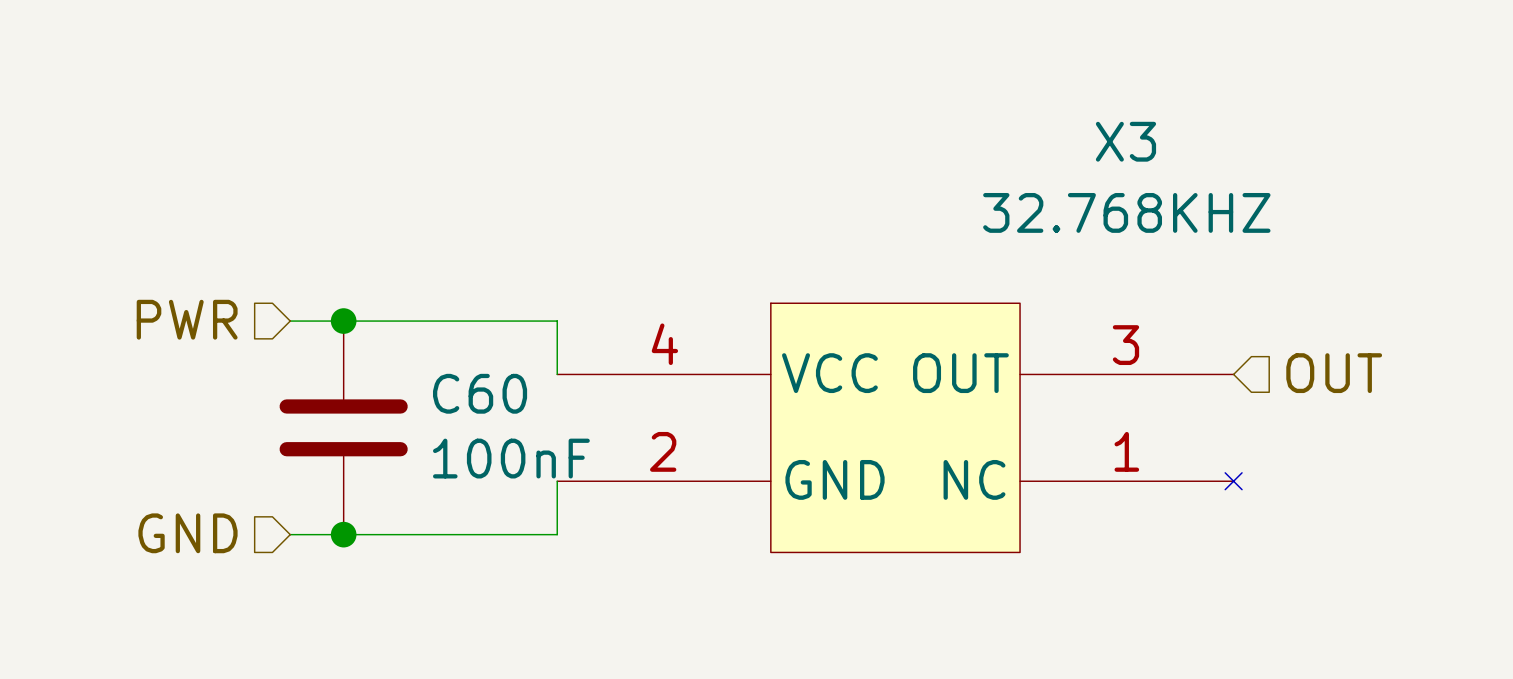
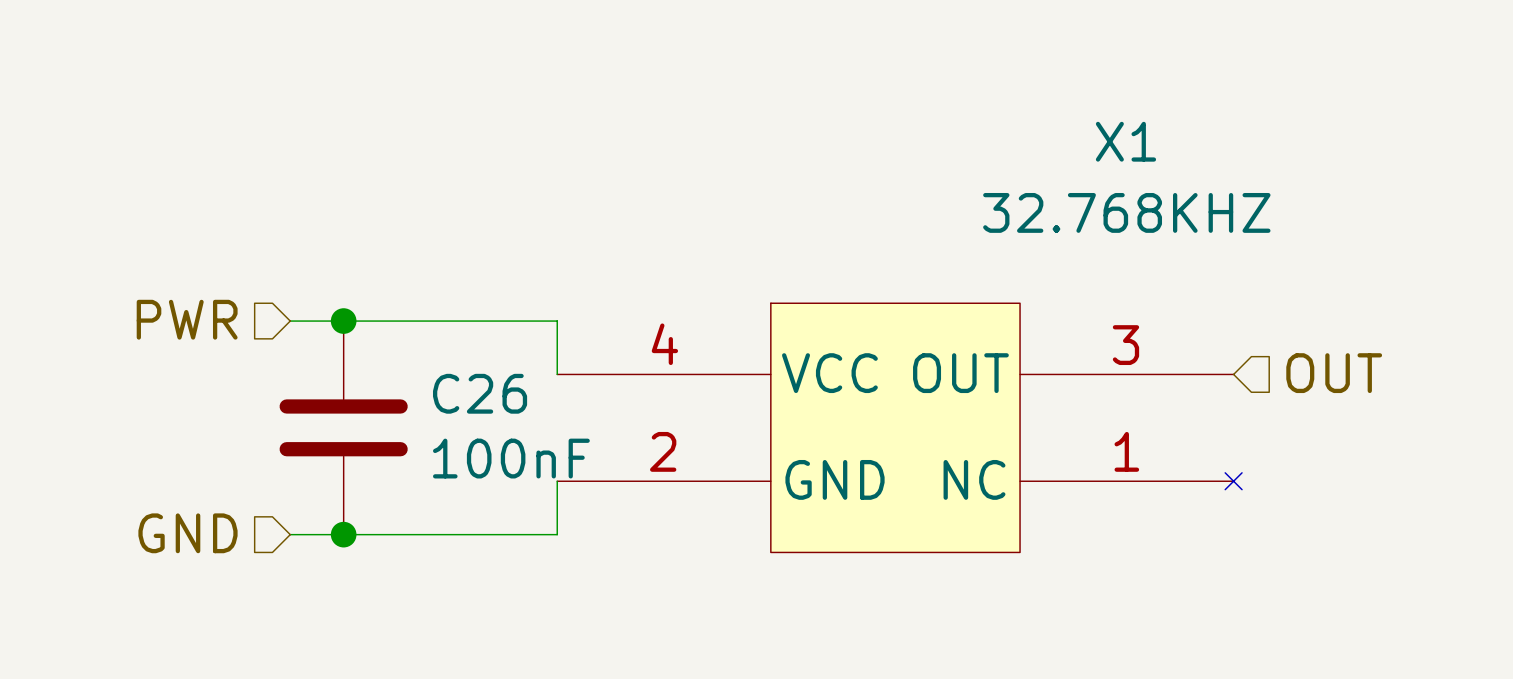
X3 name: X3 (1125, 141) -> X1 (1125, 141)
C60 name: C60 (480, 393) -> C26 (480, 393)

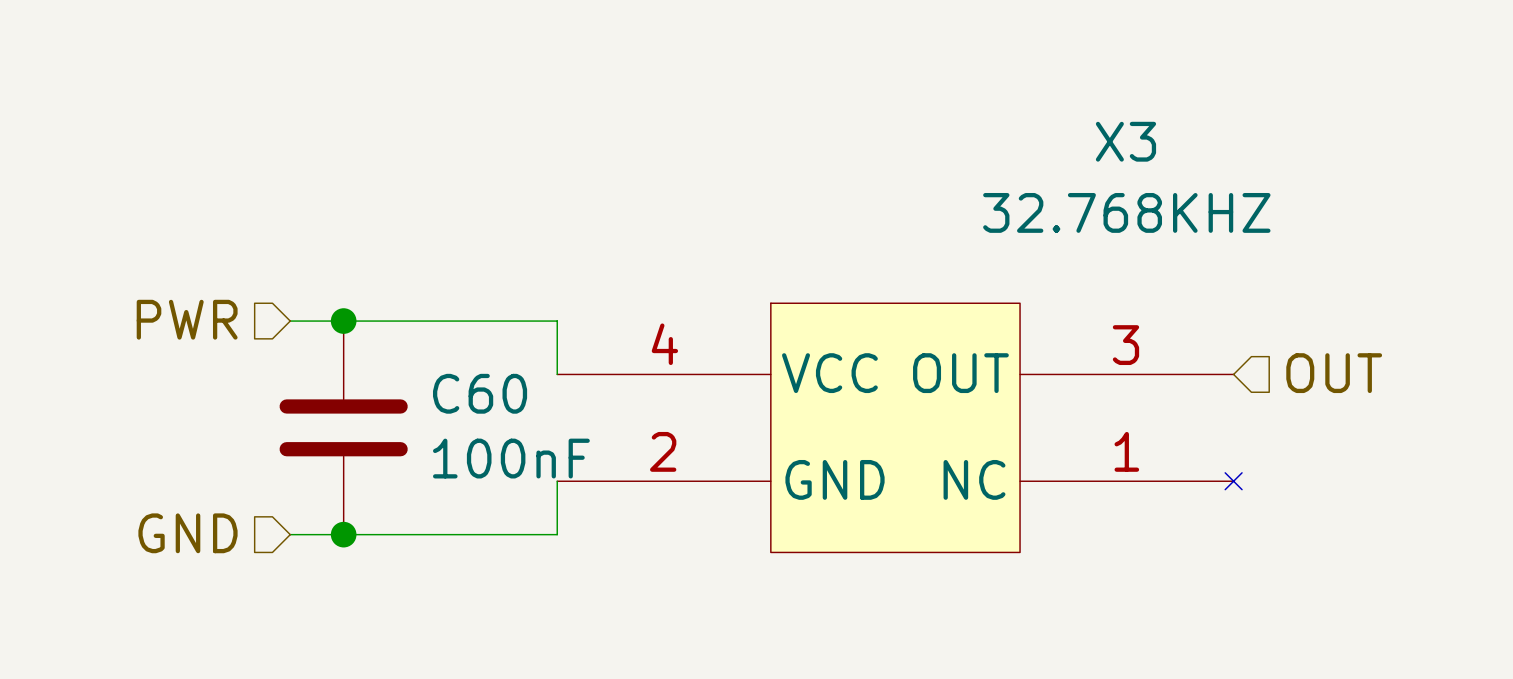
X1 name: X1 (1125, 141) -> X3 (1125, 141)
C26 name: C26 (480, 393) -> C60 (480, 393)

